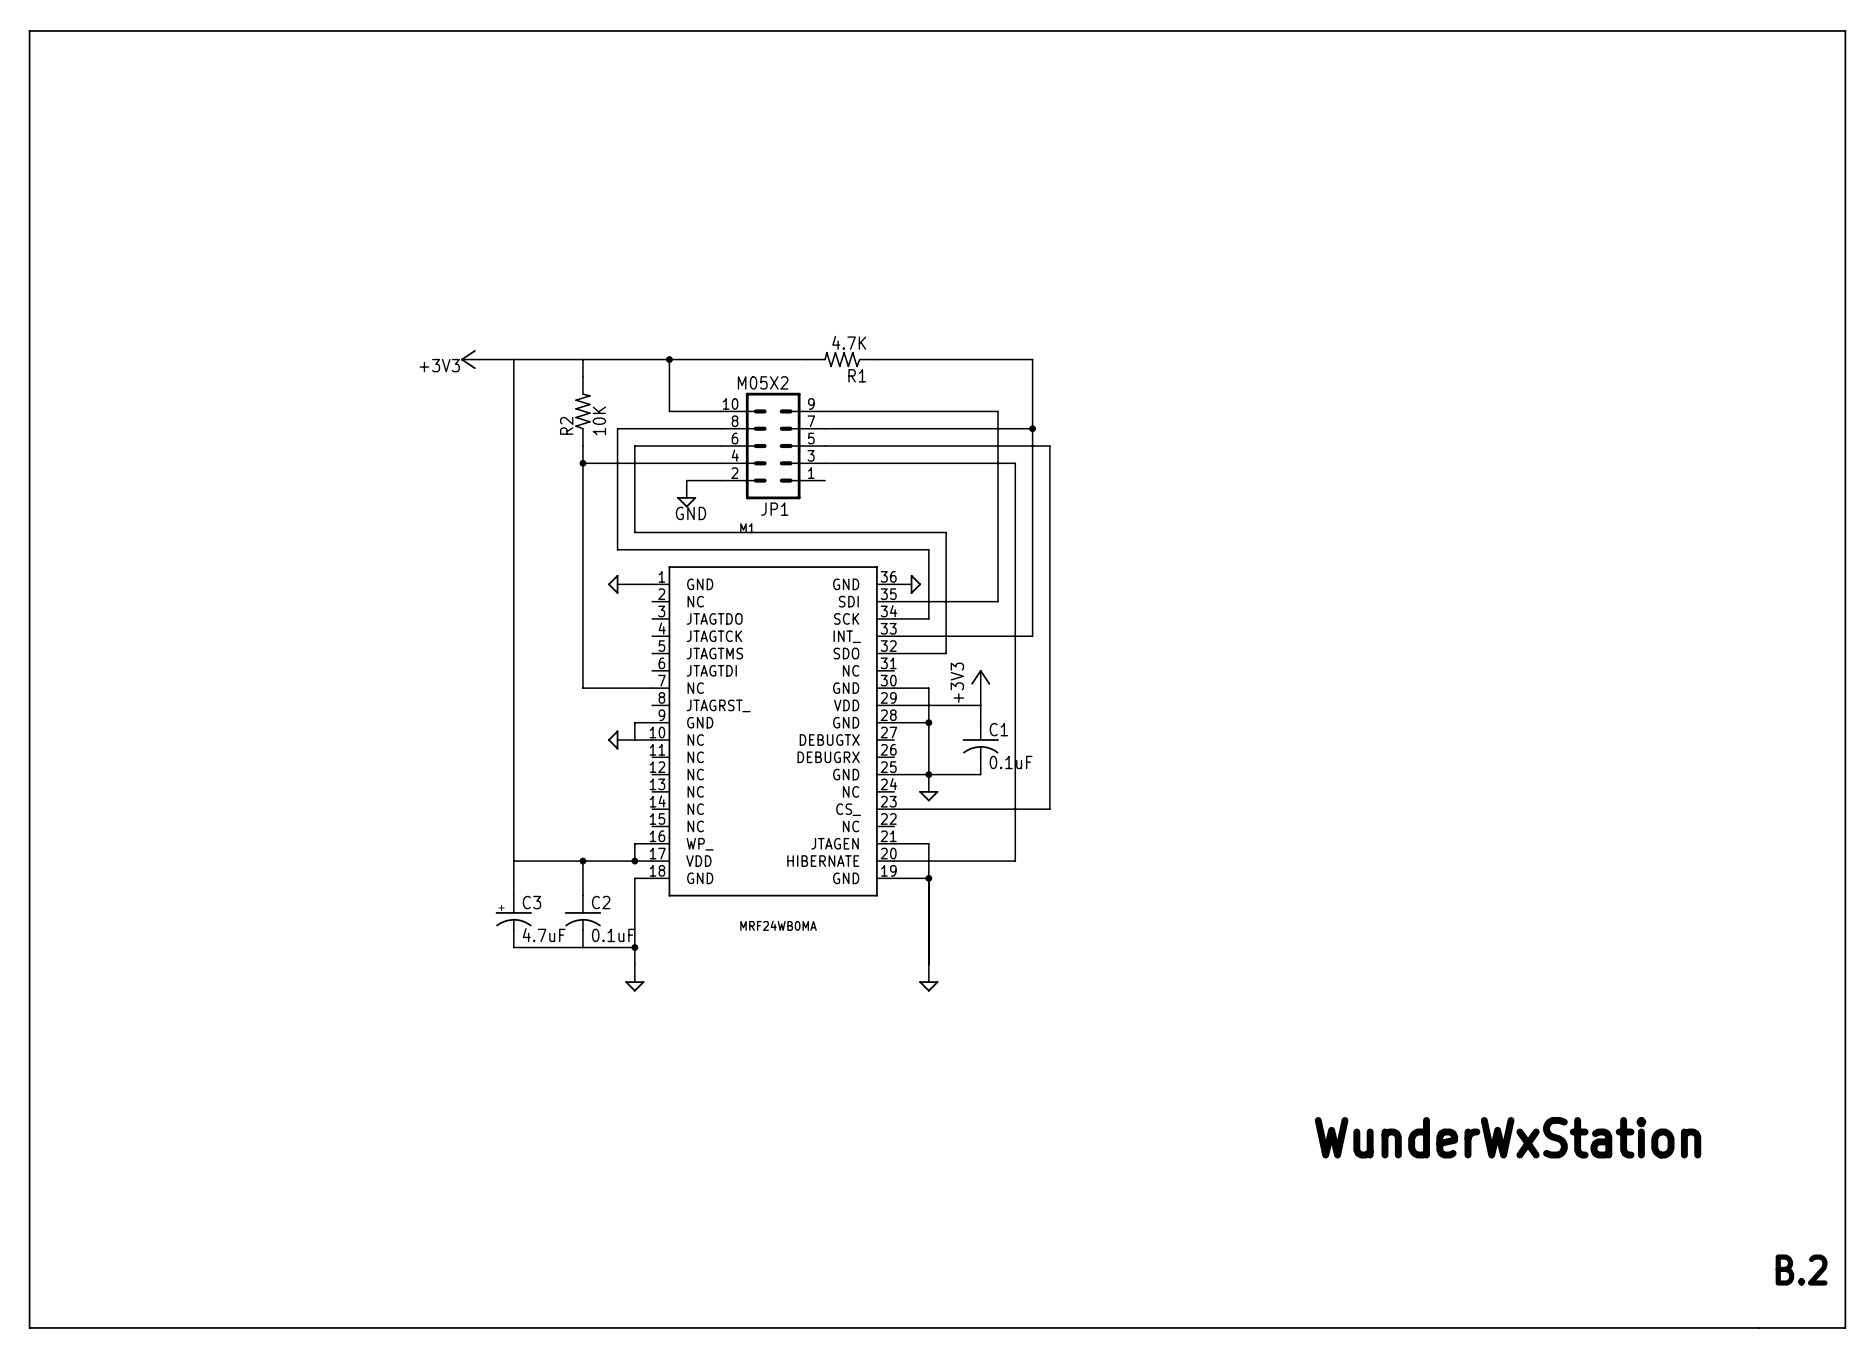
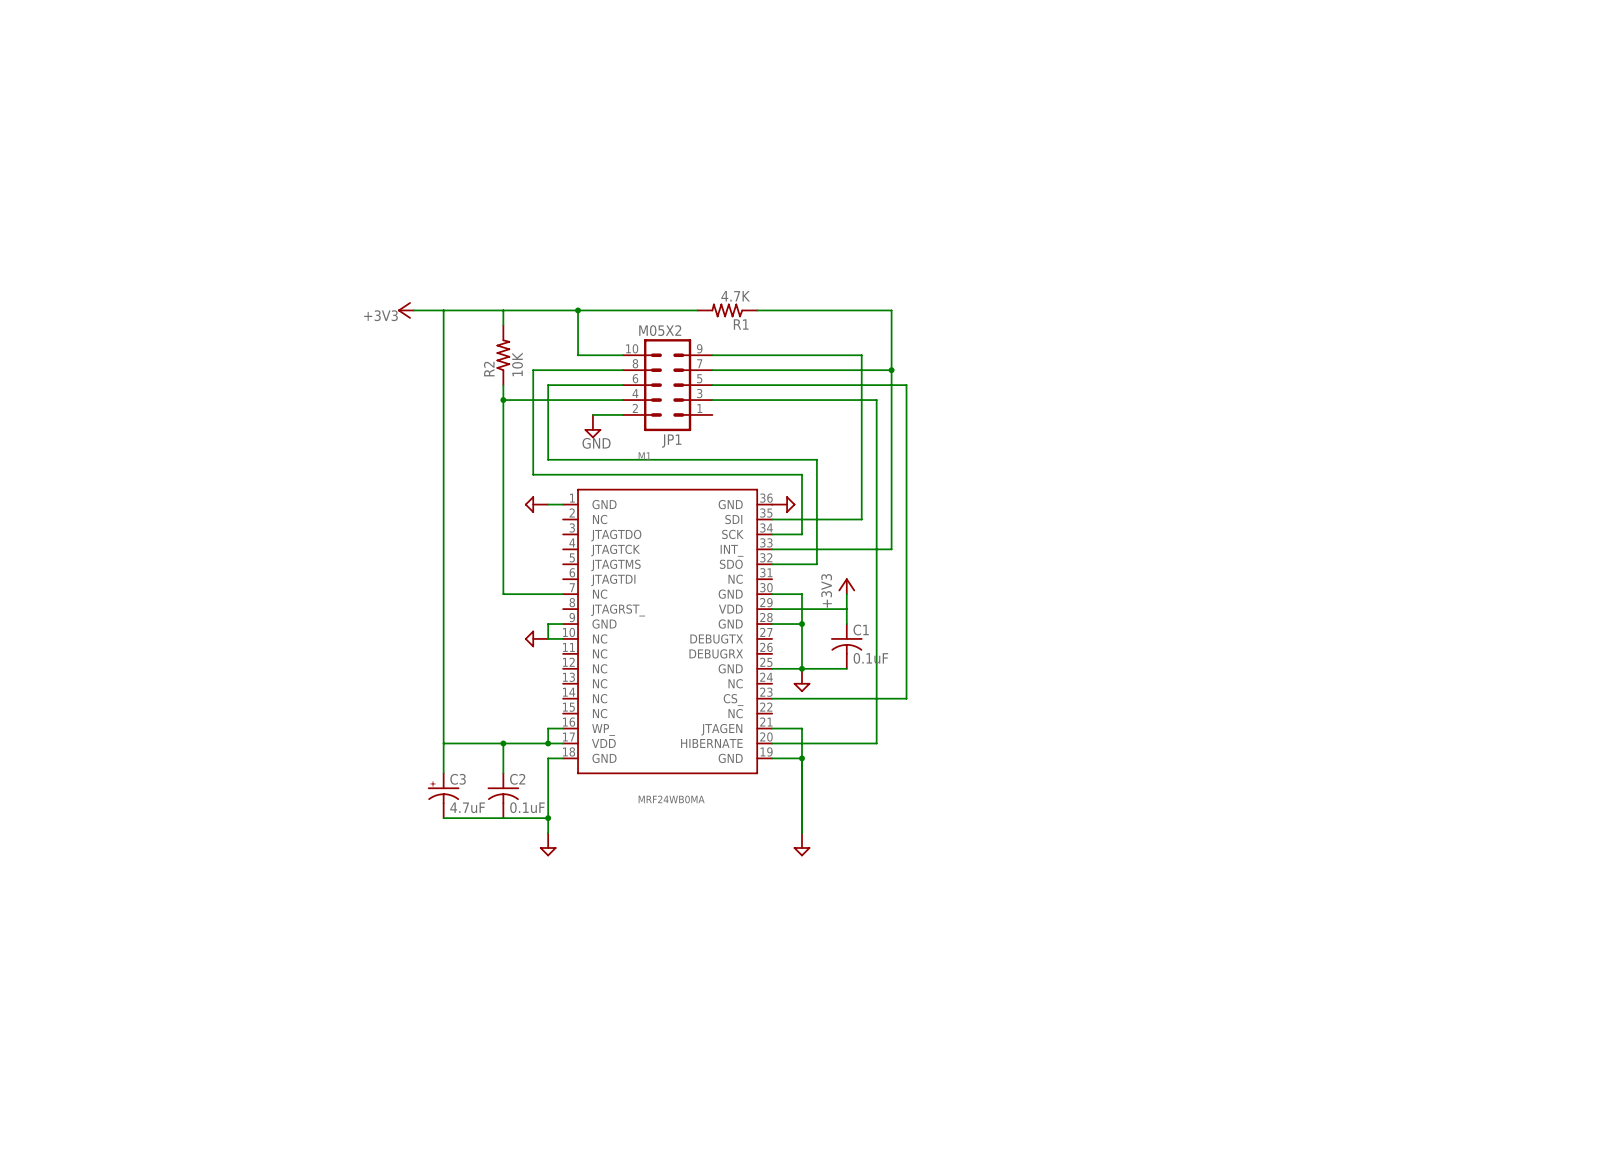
part: (937, 679) -> none
text: WunderWxStation (1508, 1137) -> none
text: B.2 (1801, 1270) -> none

